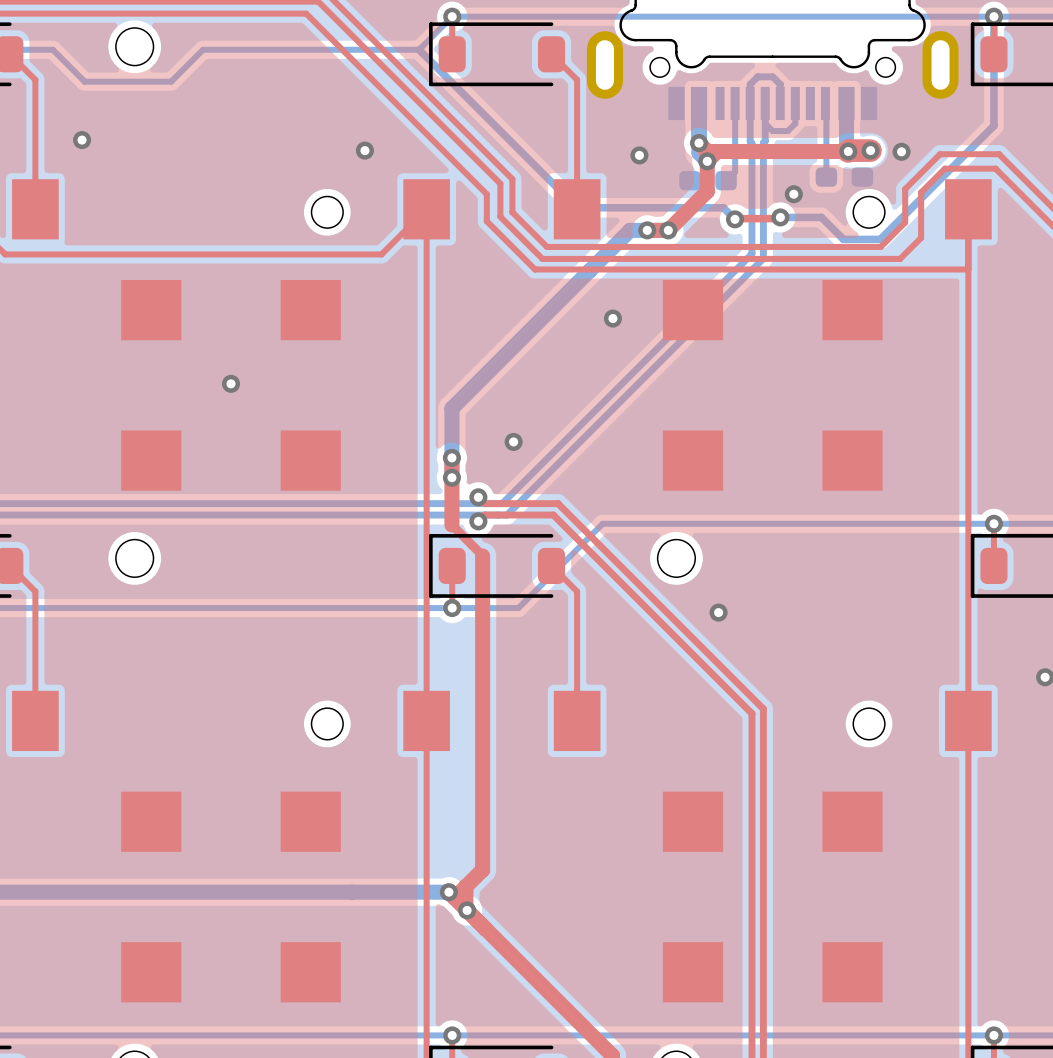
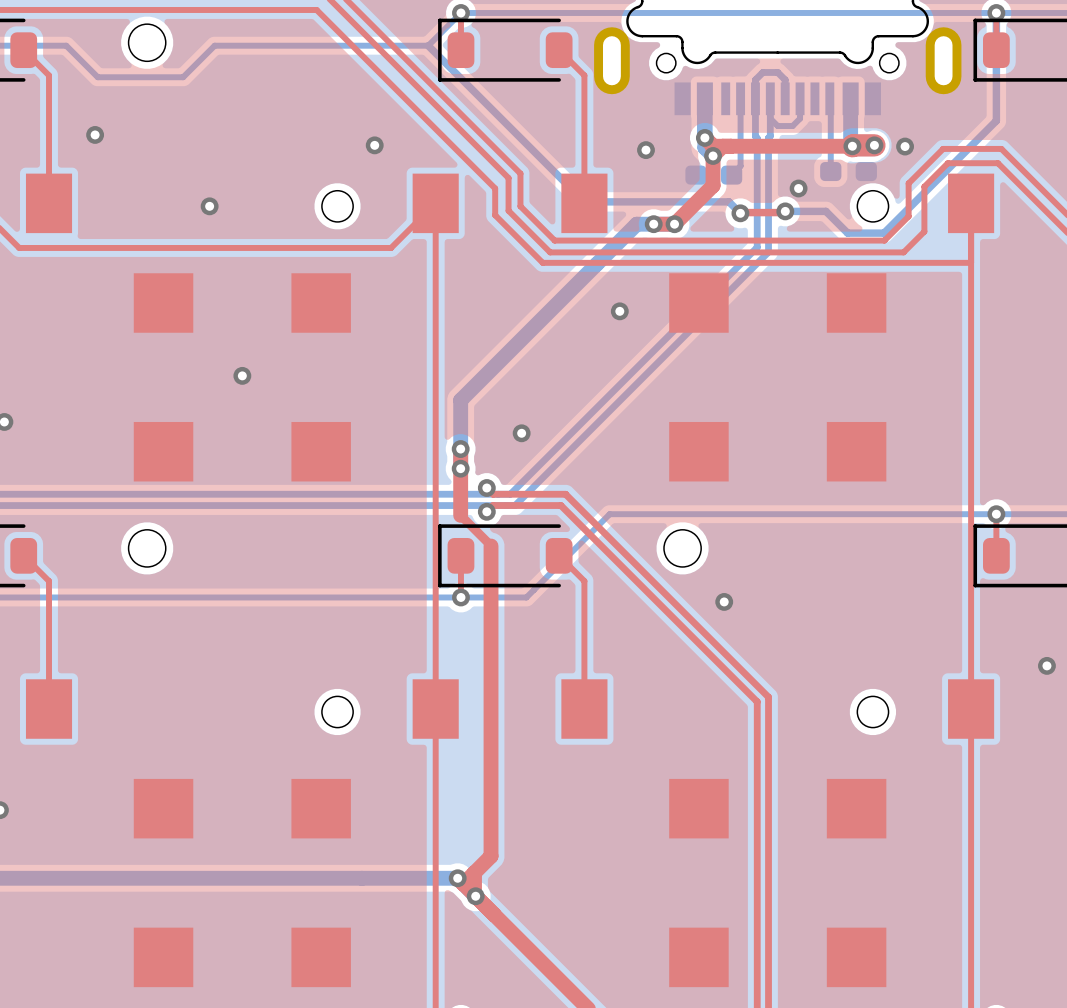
via: none -> (209, 206)

